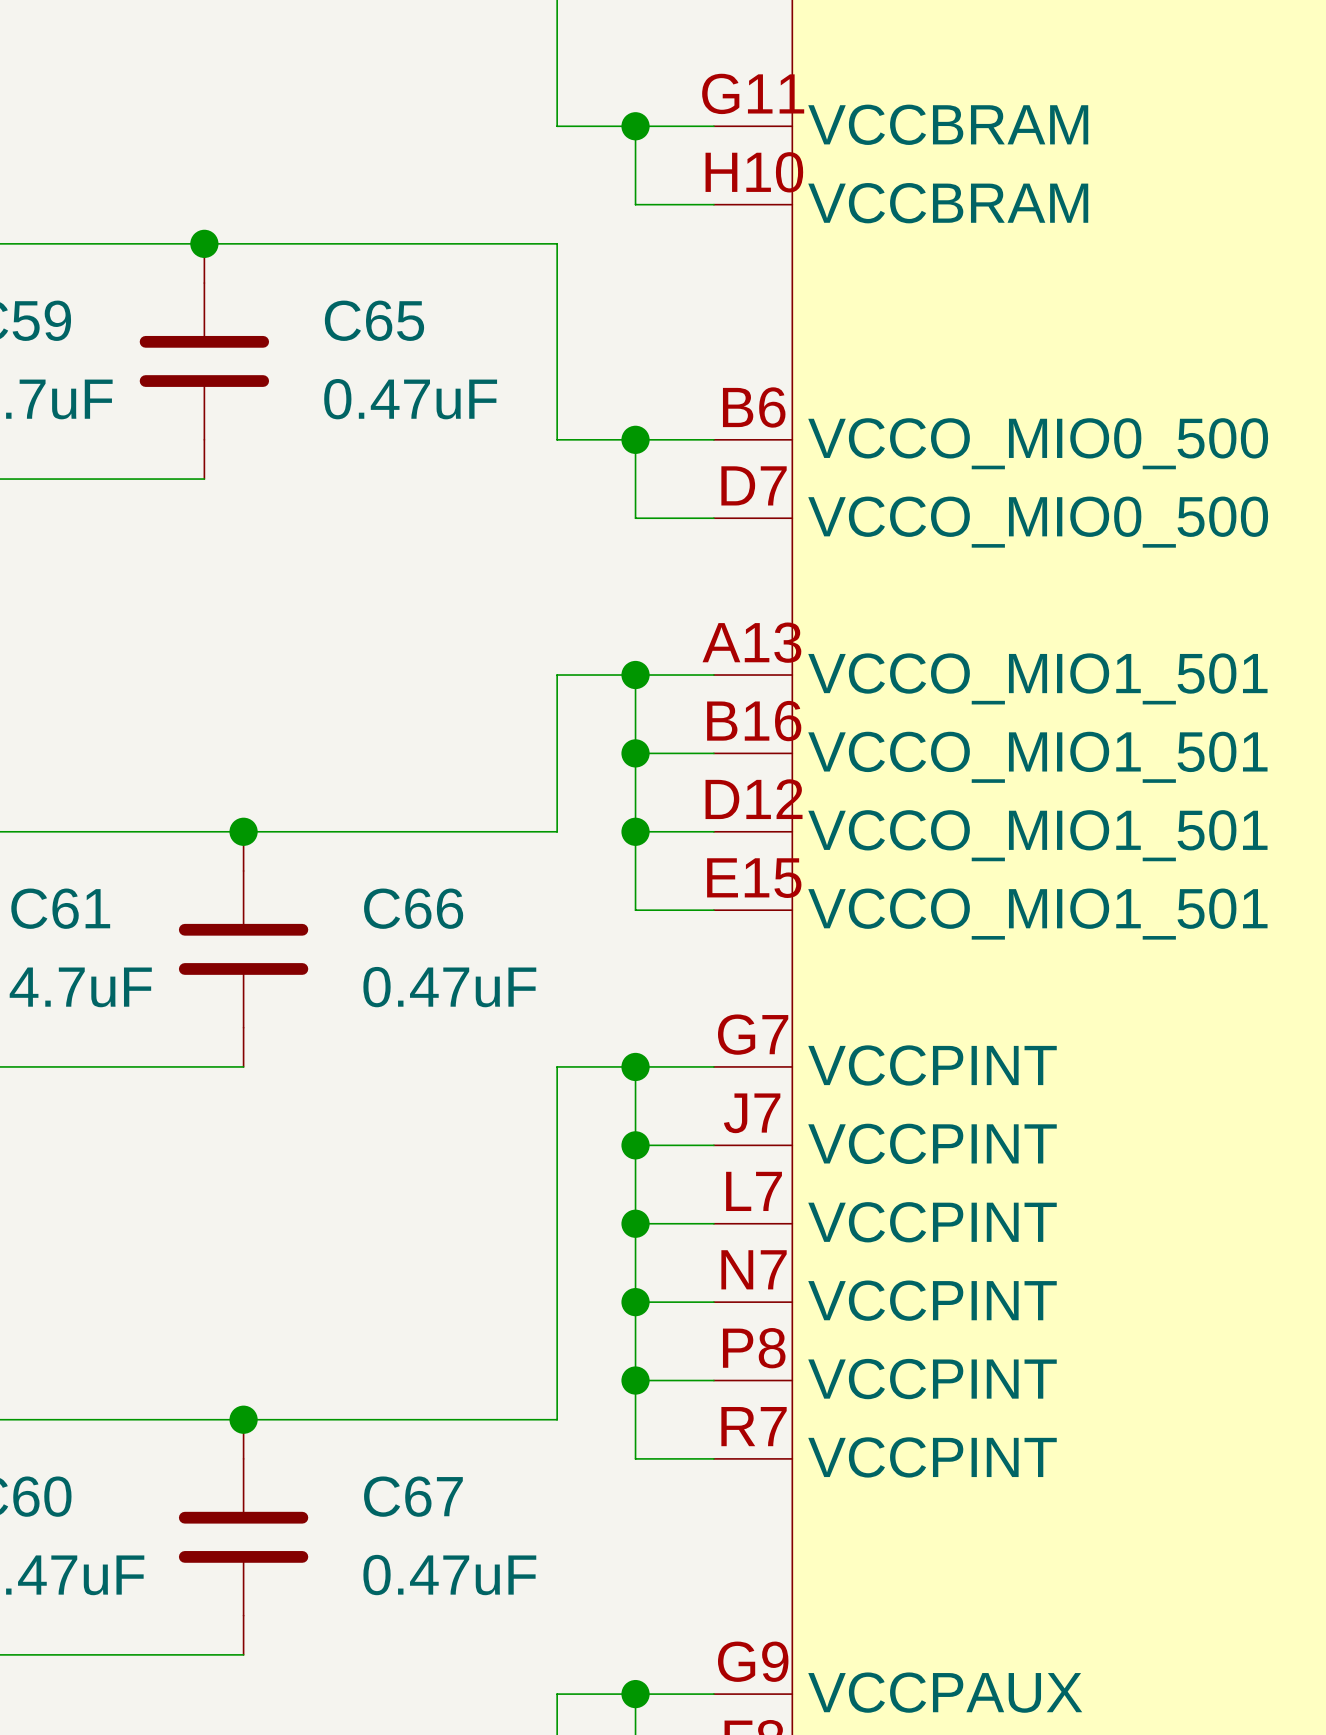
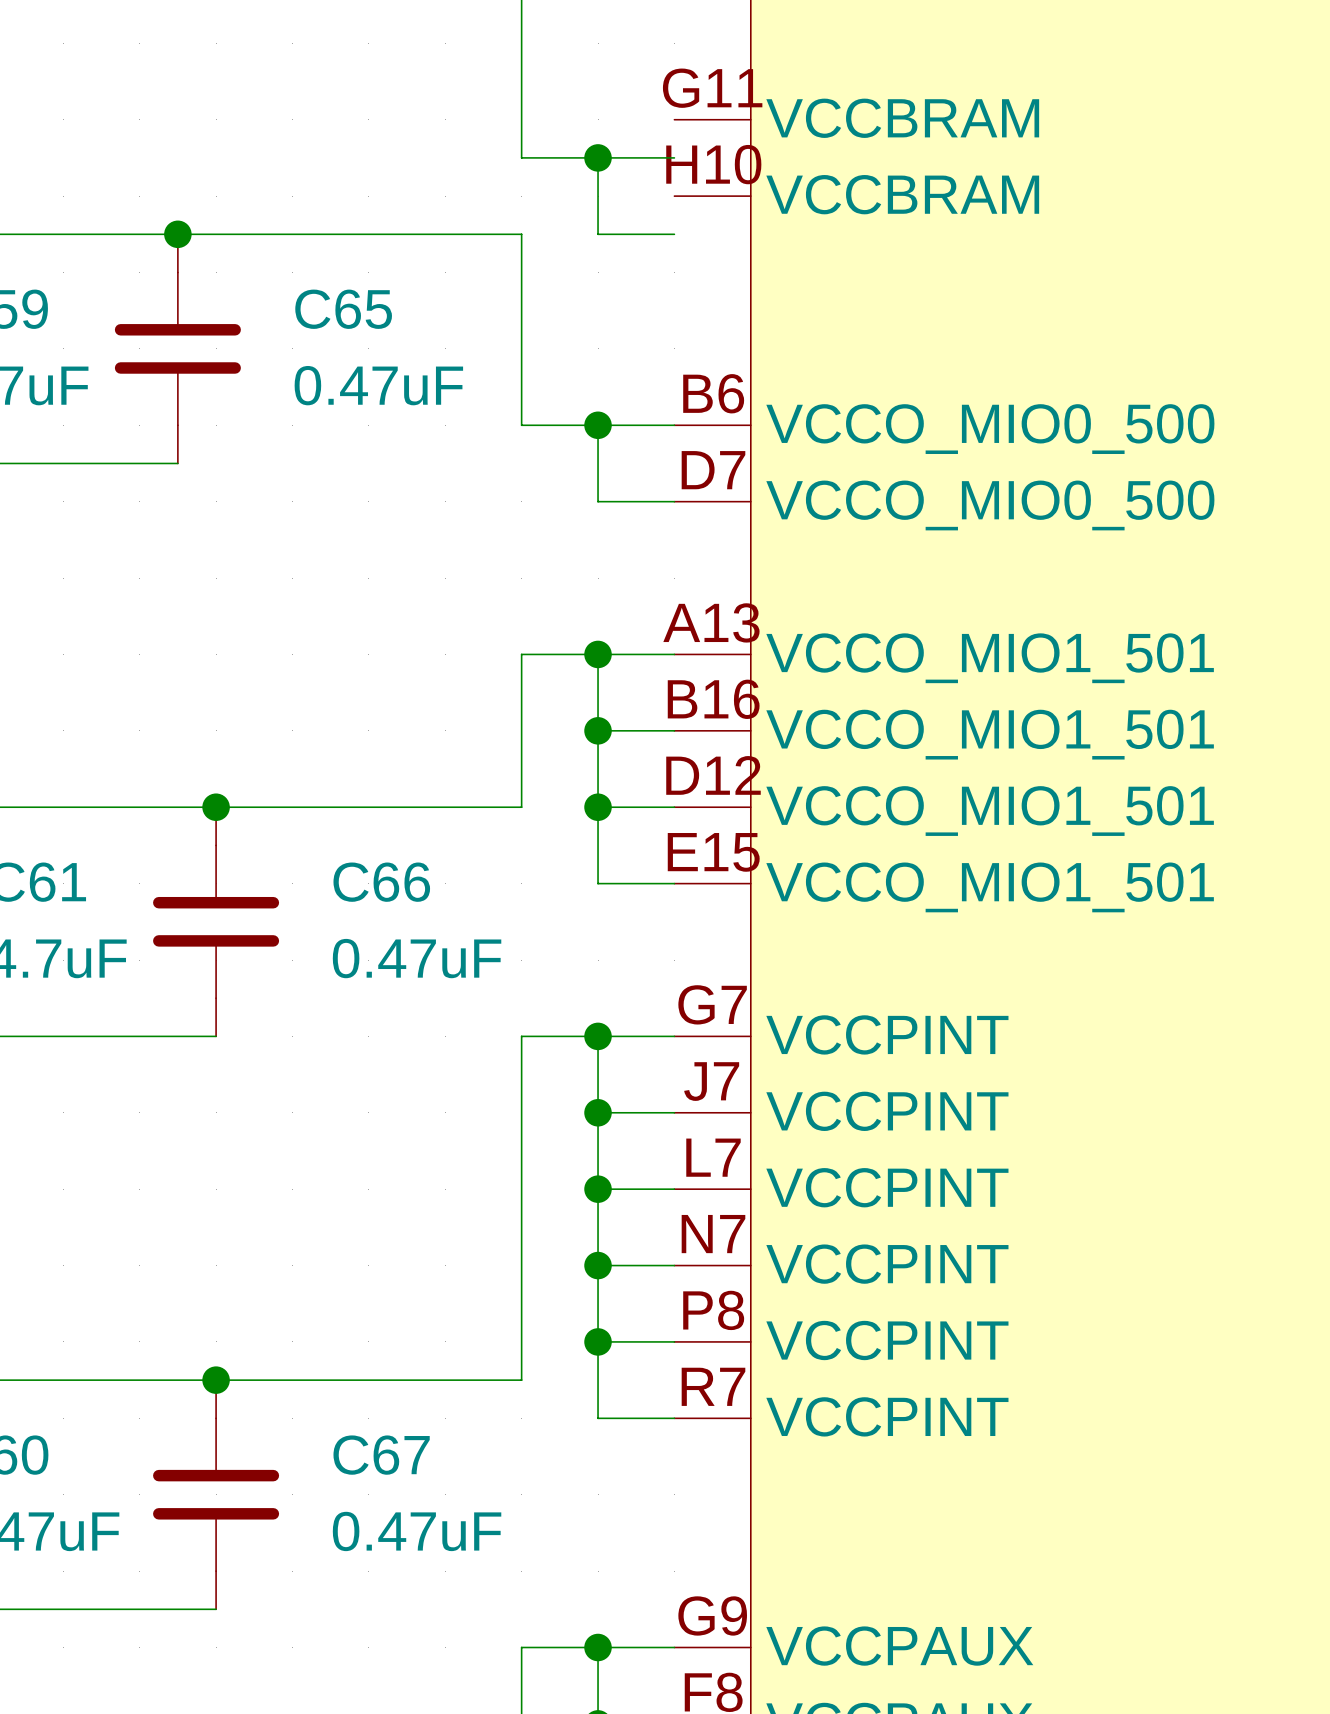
wire: (557, 126) (713, 126) -> (521, 119) (521, 157) (674, 157)
wire: (635, 126) (635, 165) -> none
junction position: (635, 126) -> (598, 157)
wire: (635, 204) (713, 204) -> (598, 196) (598, 234) (674, 234)

